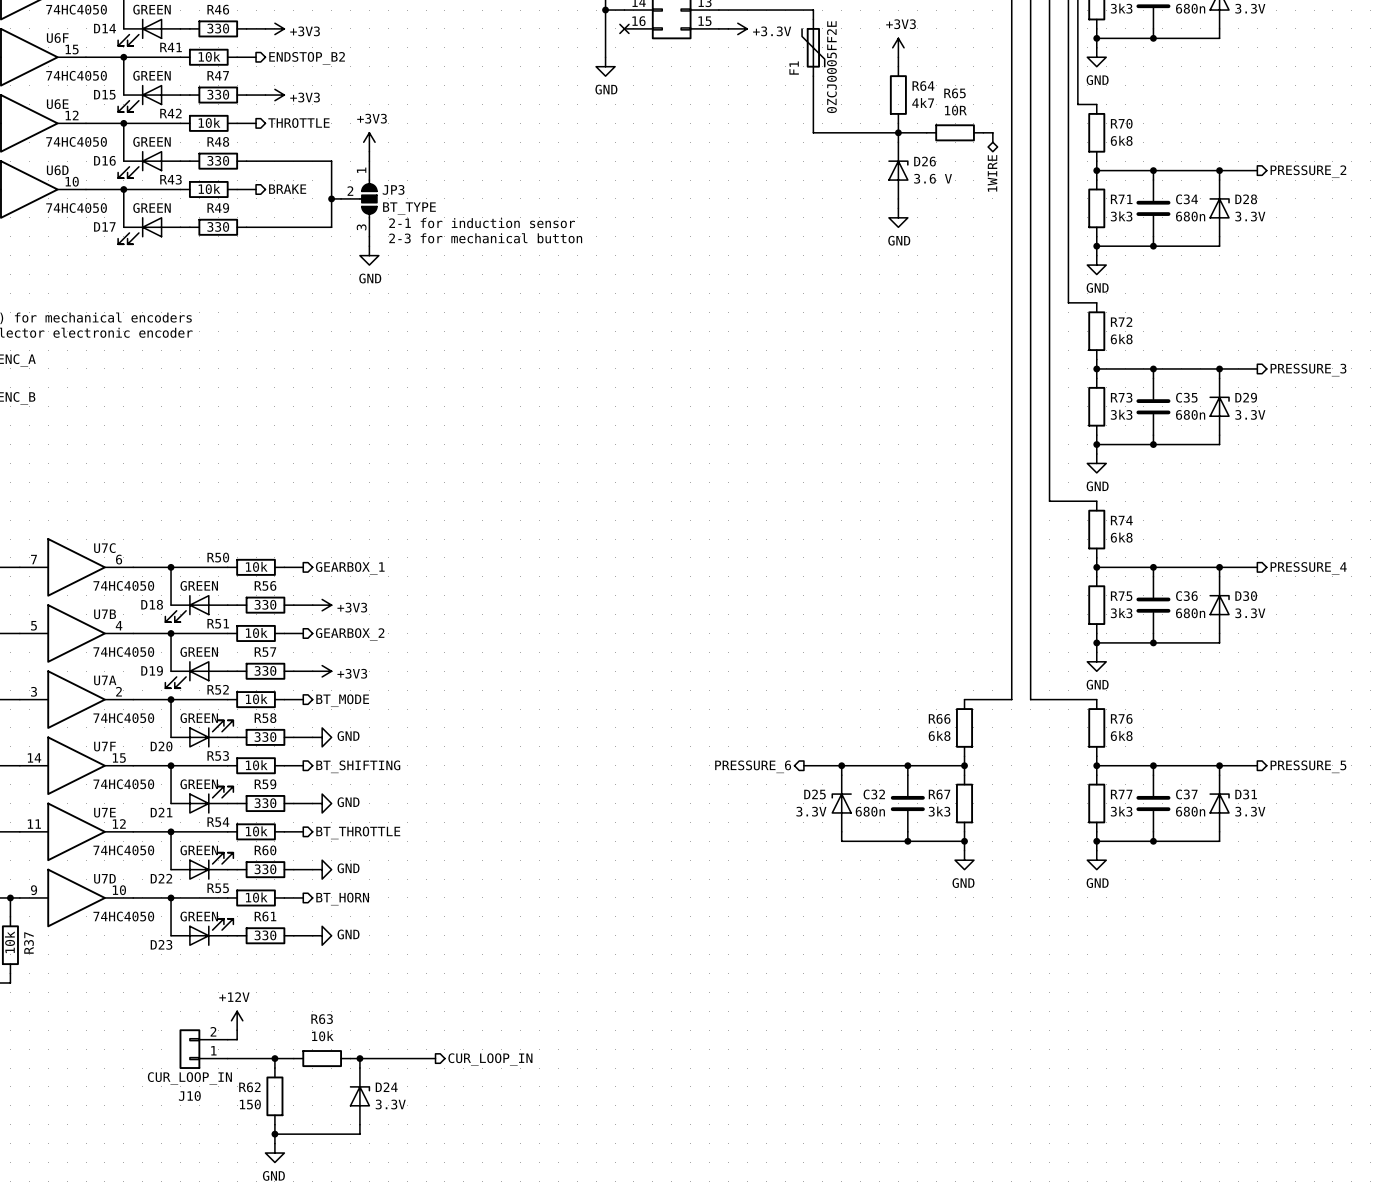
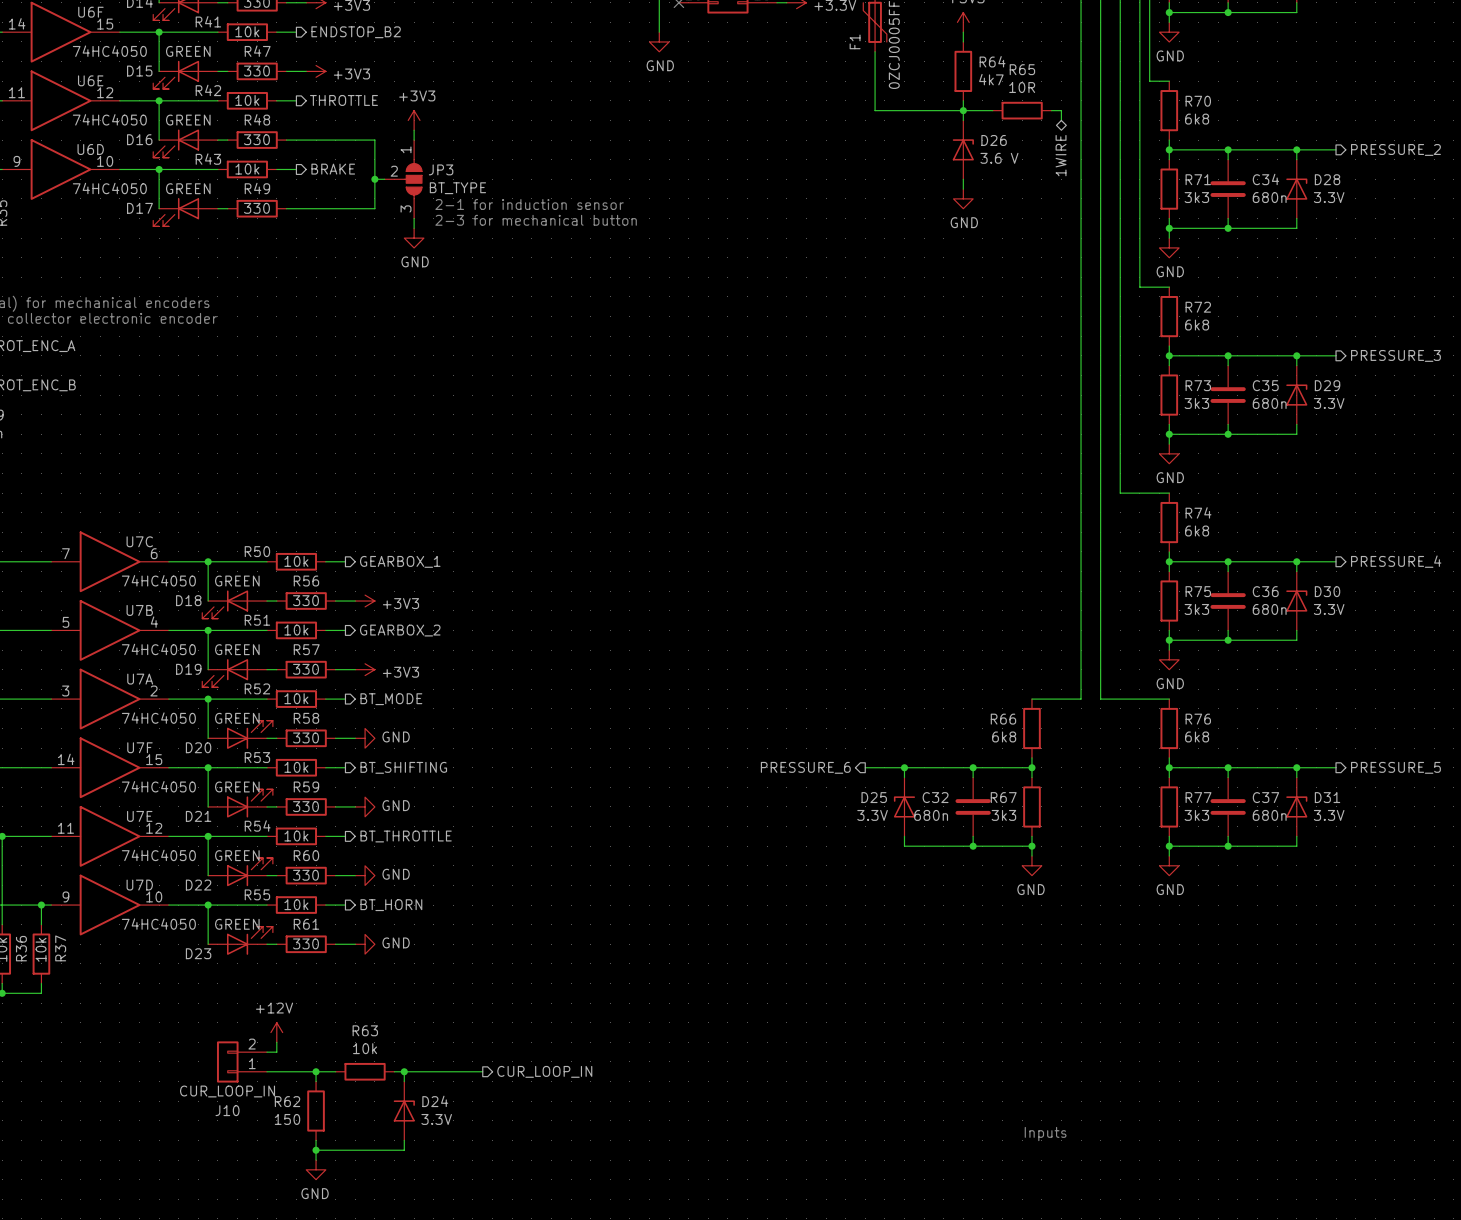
text: none -> Inputs (1045, 1134)

